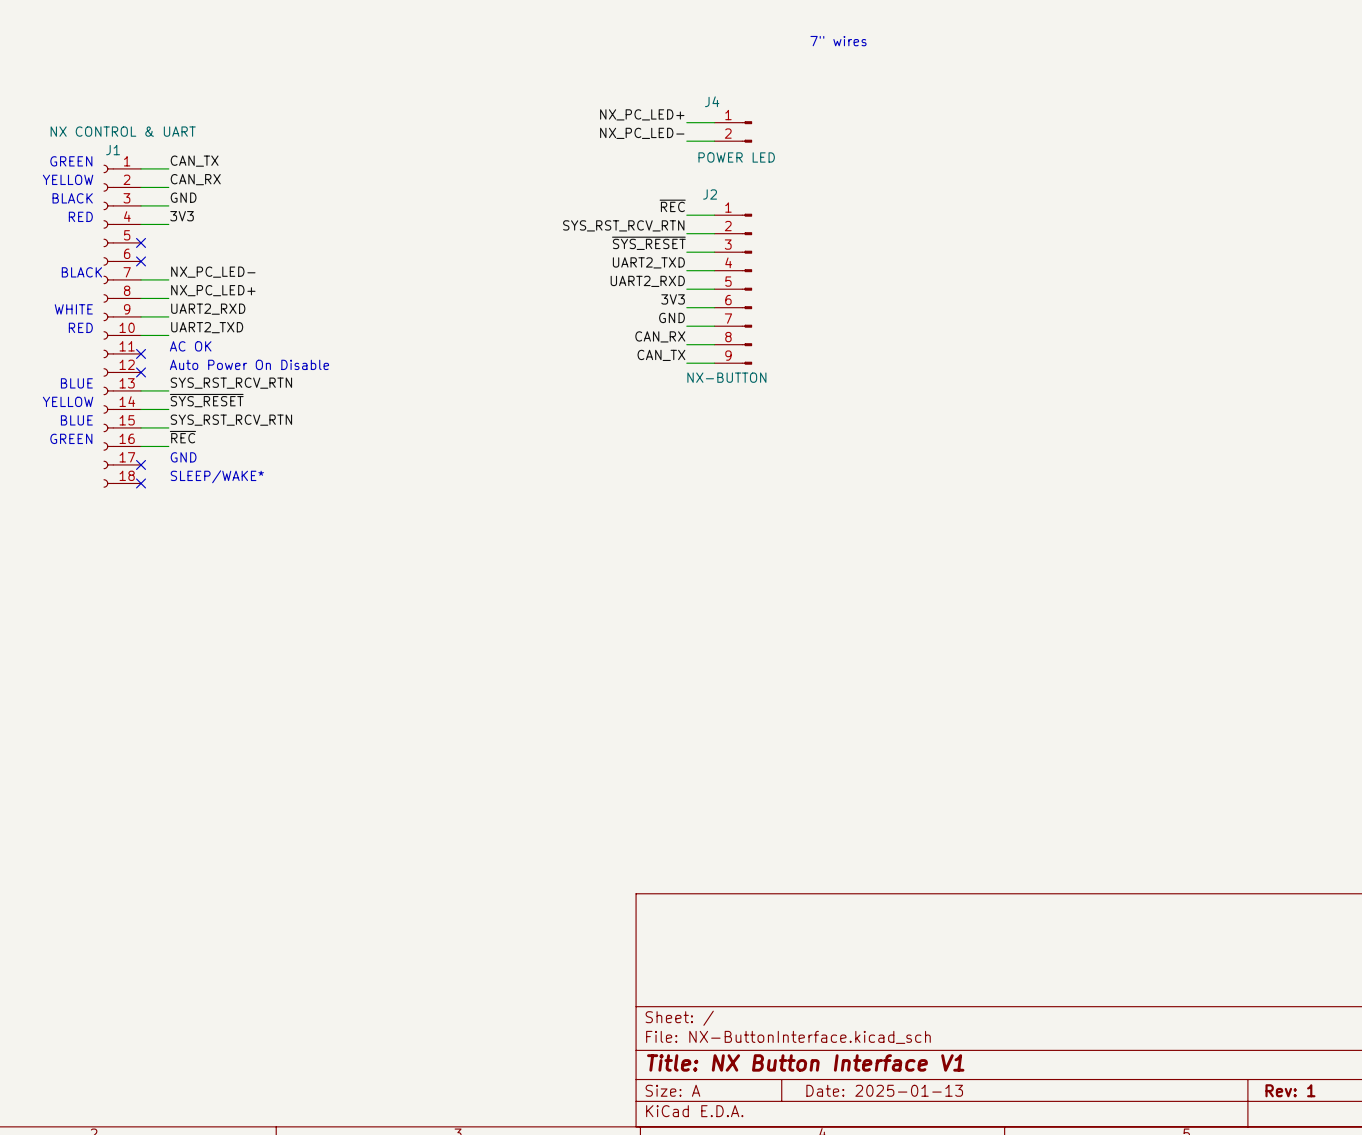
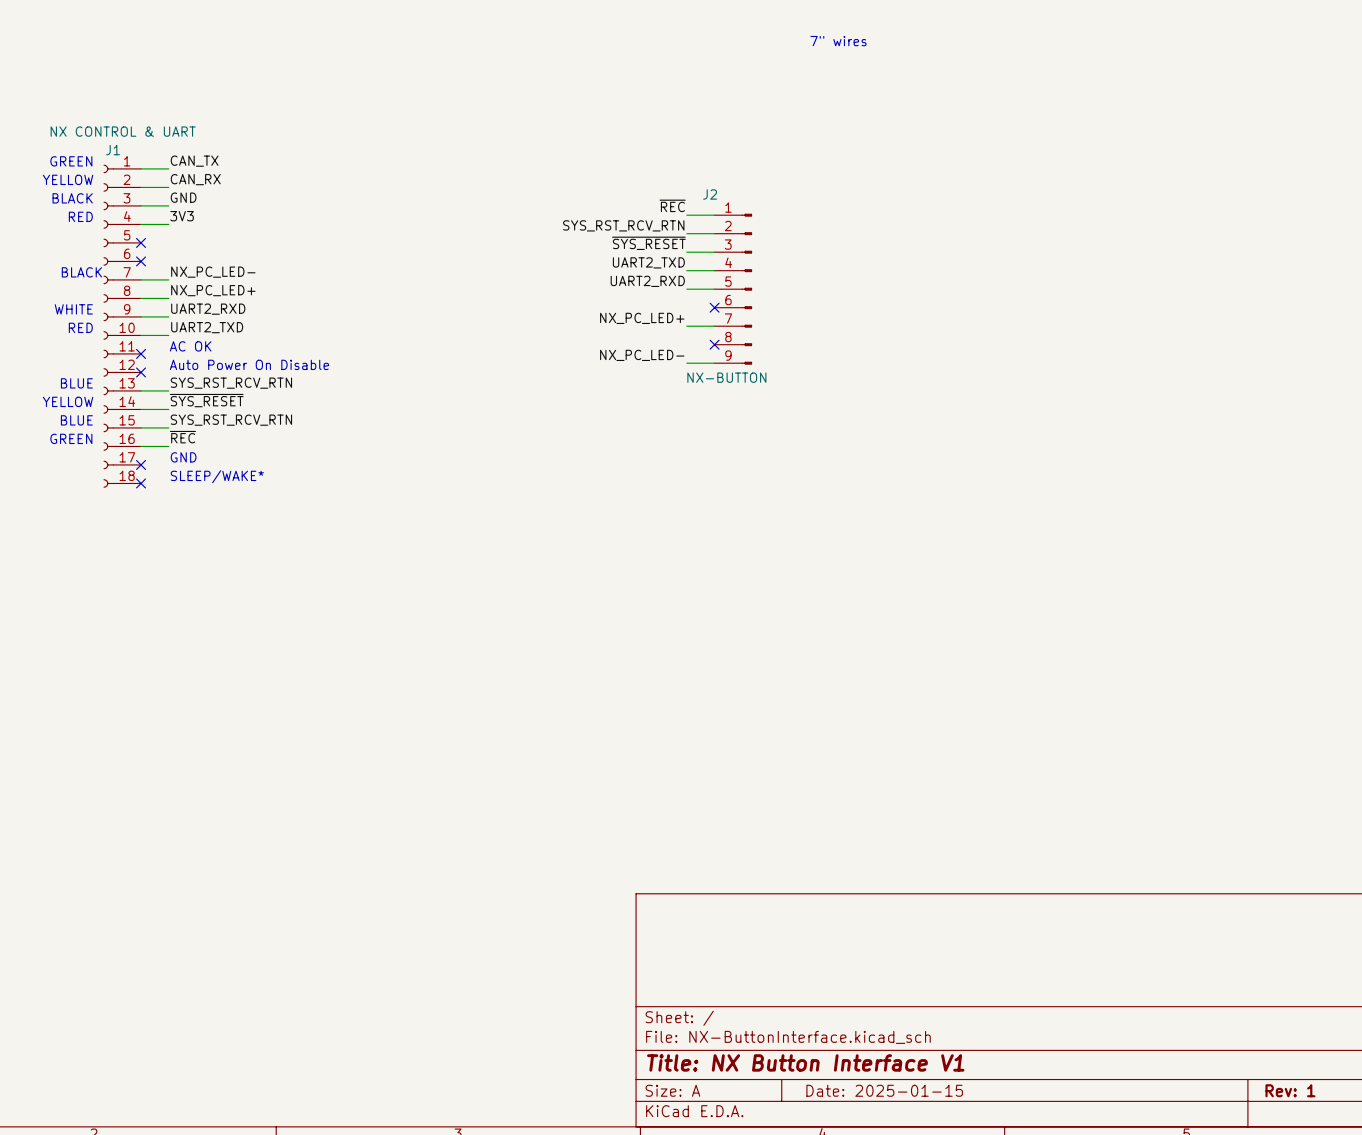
label: NX_PC_LED+ (642, 114) -> none
wire: (686, 122) (714, 122) -> none
J4: POWER LED (733, 131) -> none
label: NX_PC_LED- (642, 133) -> none
wire: (686, 141) (714, 141) -> none
label: 3V3 (673, 299) -> none
wire: (686, 307) (714, 307) -> none
no-connect mark: none -> (714, 307)
label: GND (672, 317) -> NX_PC_LED+ (642, 318)
label: CAN_RX (660, 336) -> none
wire: (686, 344) (714, 344) -> none
no-connect mark: none -> (714, 344)
label: CAN_TX (661, 355) -> NX_PC_LED- (642, 355)
title block: Date: 2025-01-13 (884, 1090) -> Date: 2025-01-15 (884, 1090)

